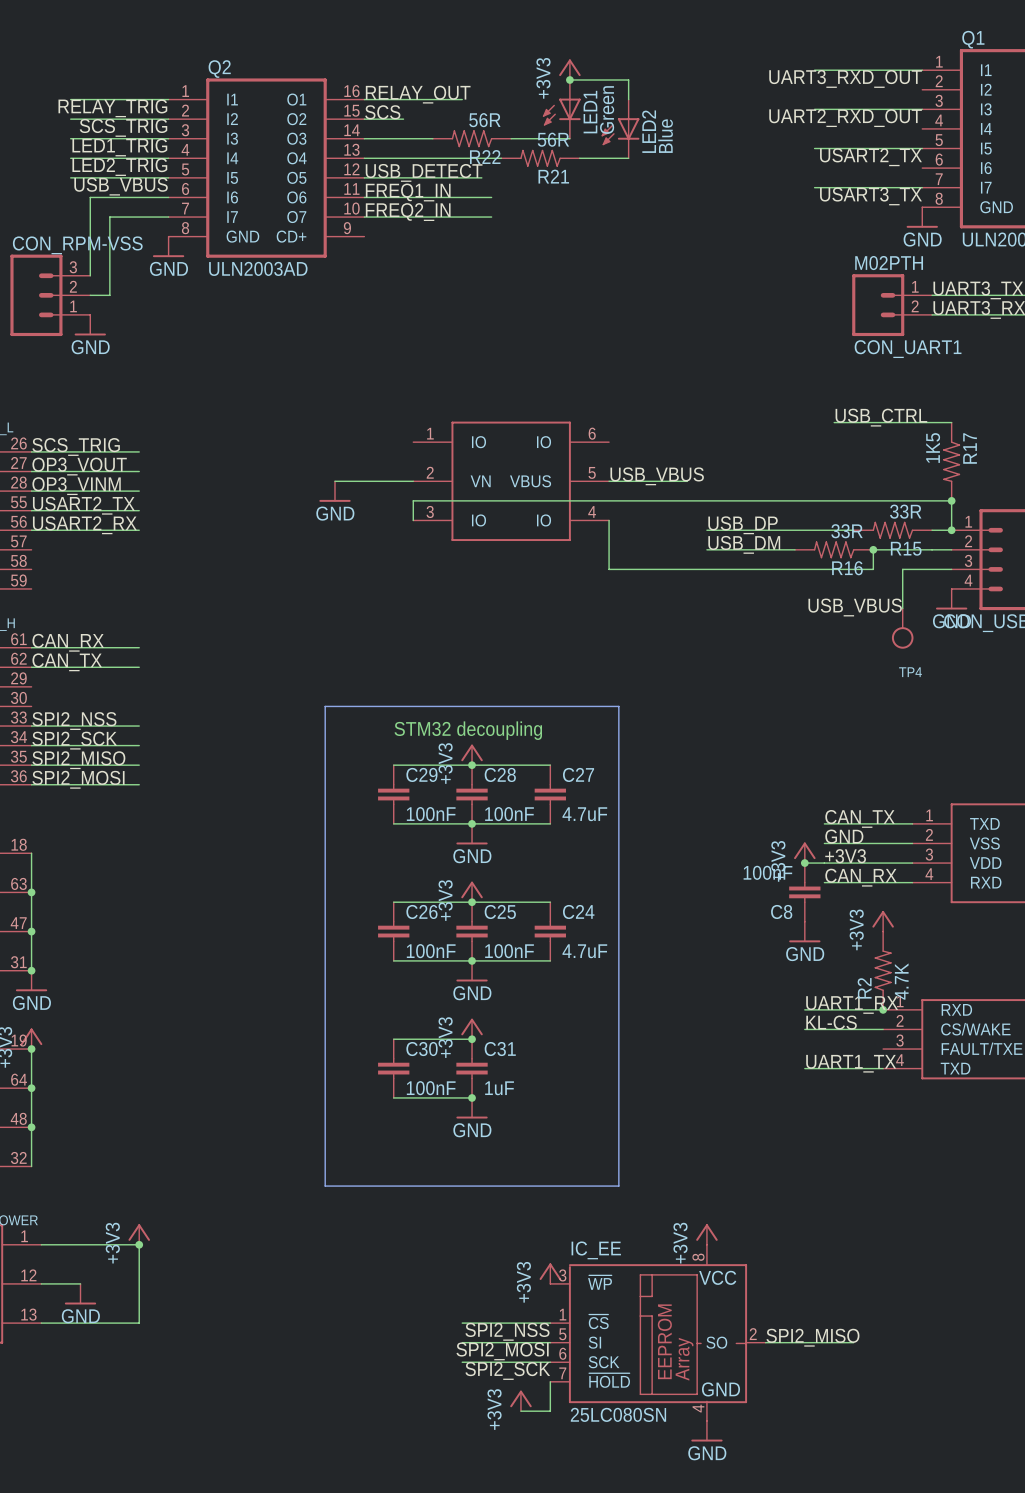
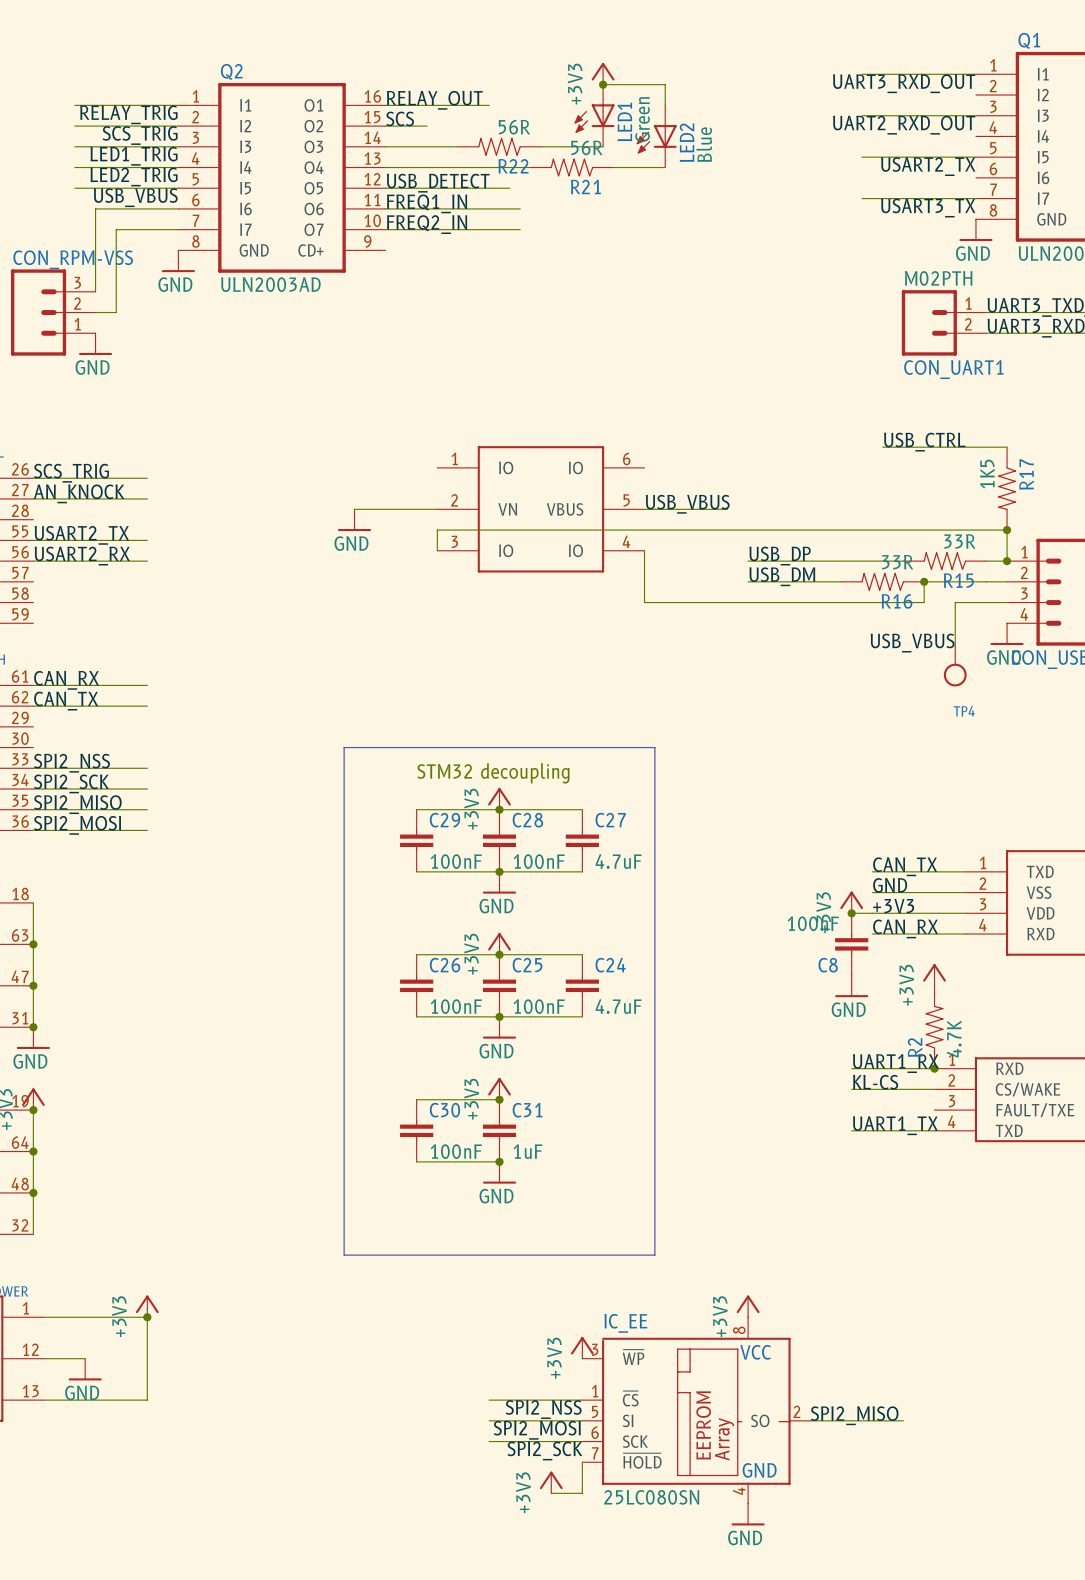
label: OP3_VOUT (79, 466) -> AN_KNOCK (79, 493)
label: OP3_VINM (76, 486) -> none
wire: (31, 491) (139, 491) -> none

